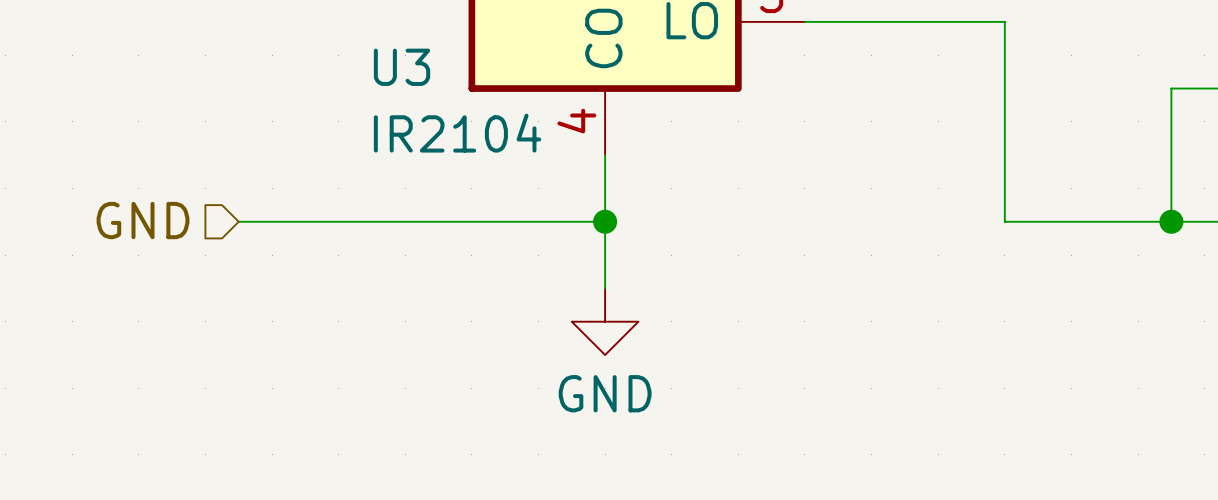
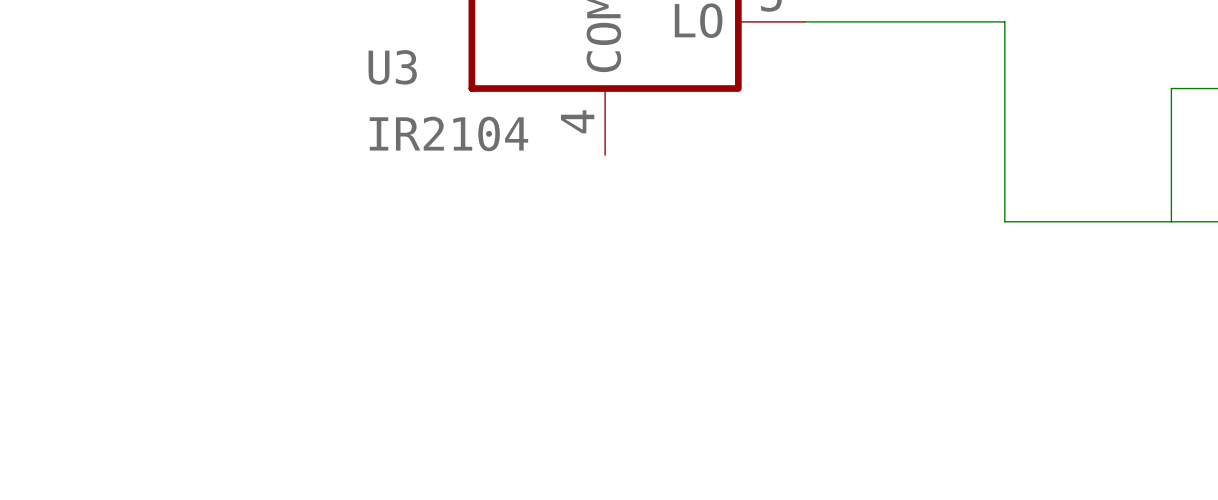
wire: (605, 155) (605, 288) -> none
hierarchical label: GND (143, 220) -> none
wire: (238, 221) (605, 221) -> none
junction: (605, 221) -> none
junction: (1171, 221) -> none
power symbol: GND (605, 321) -> none

